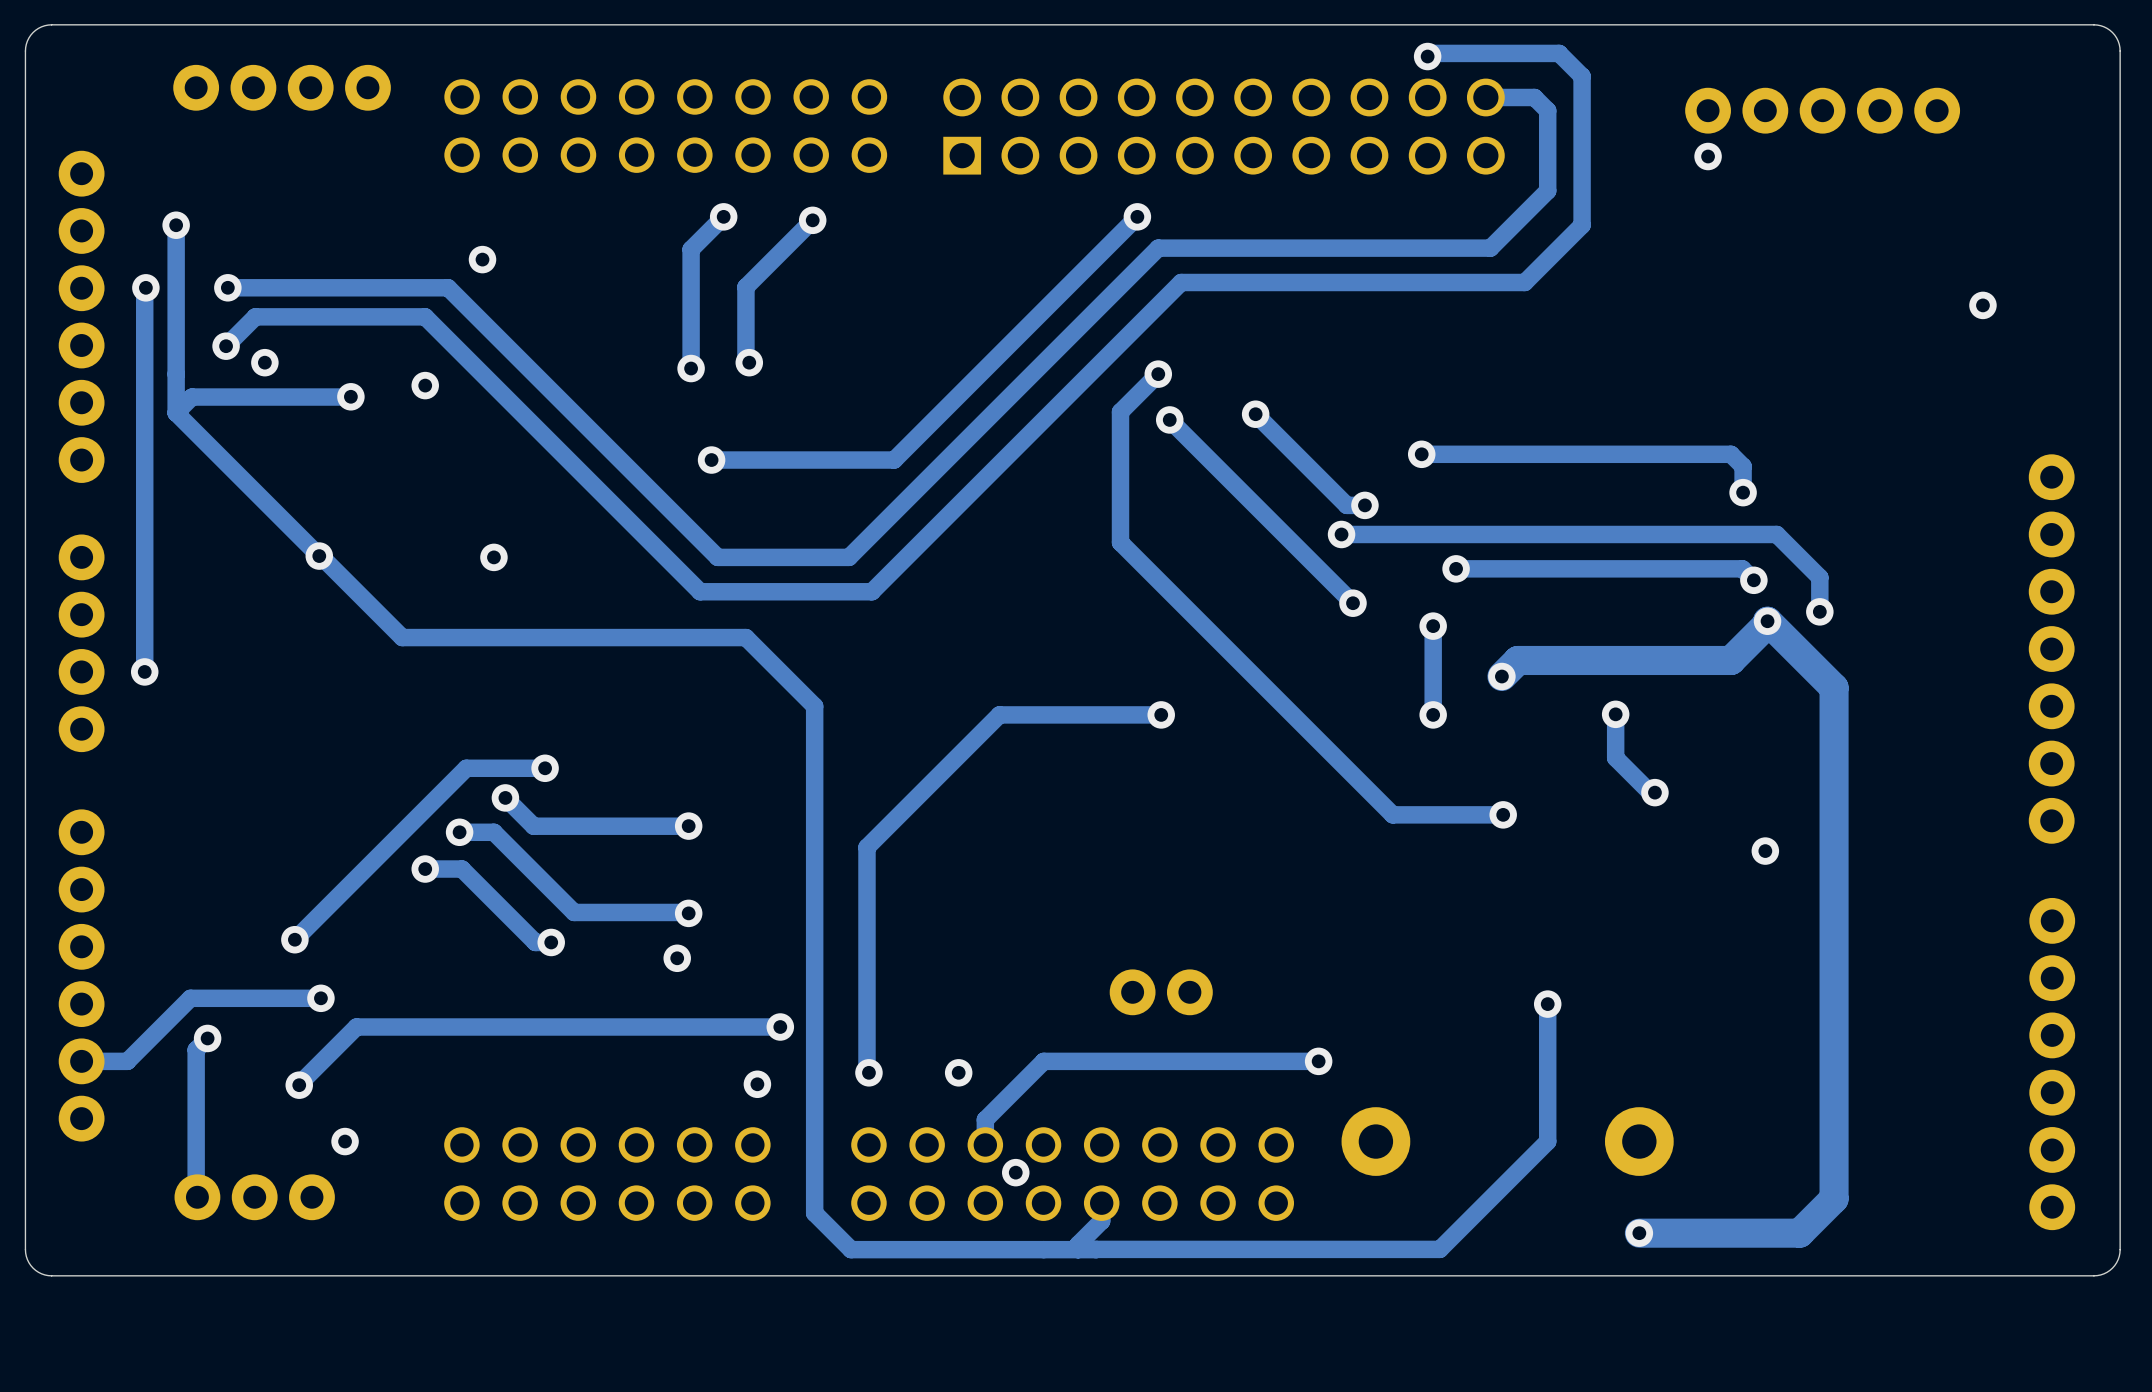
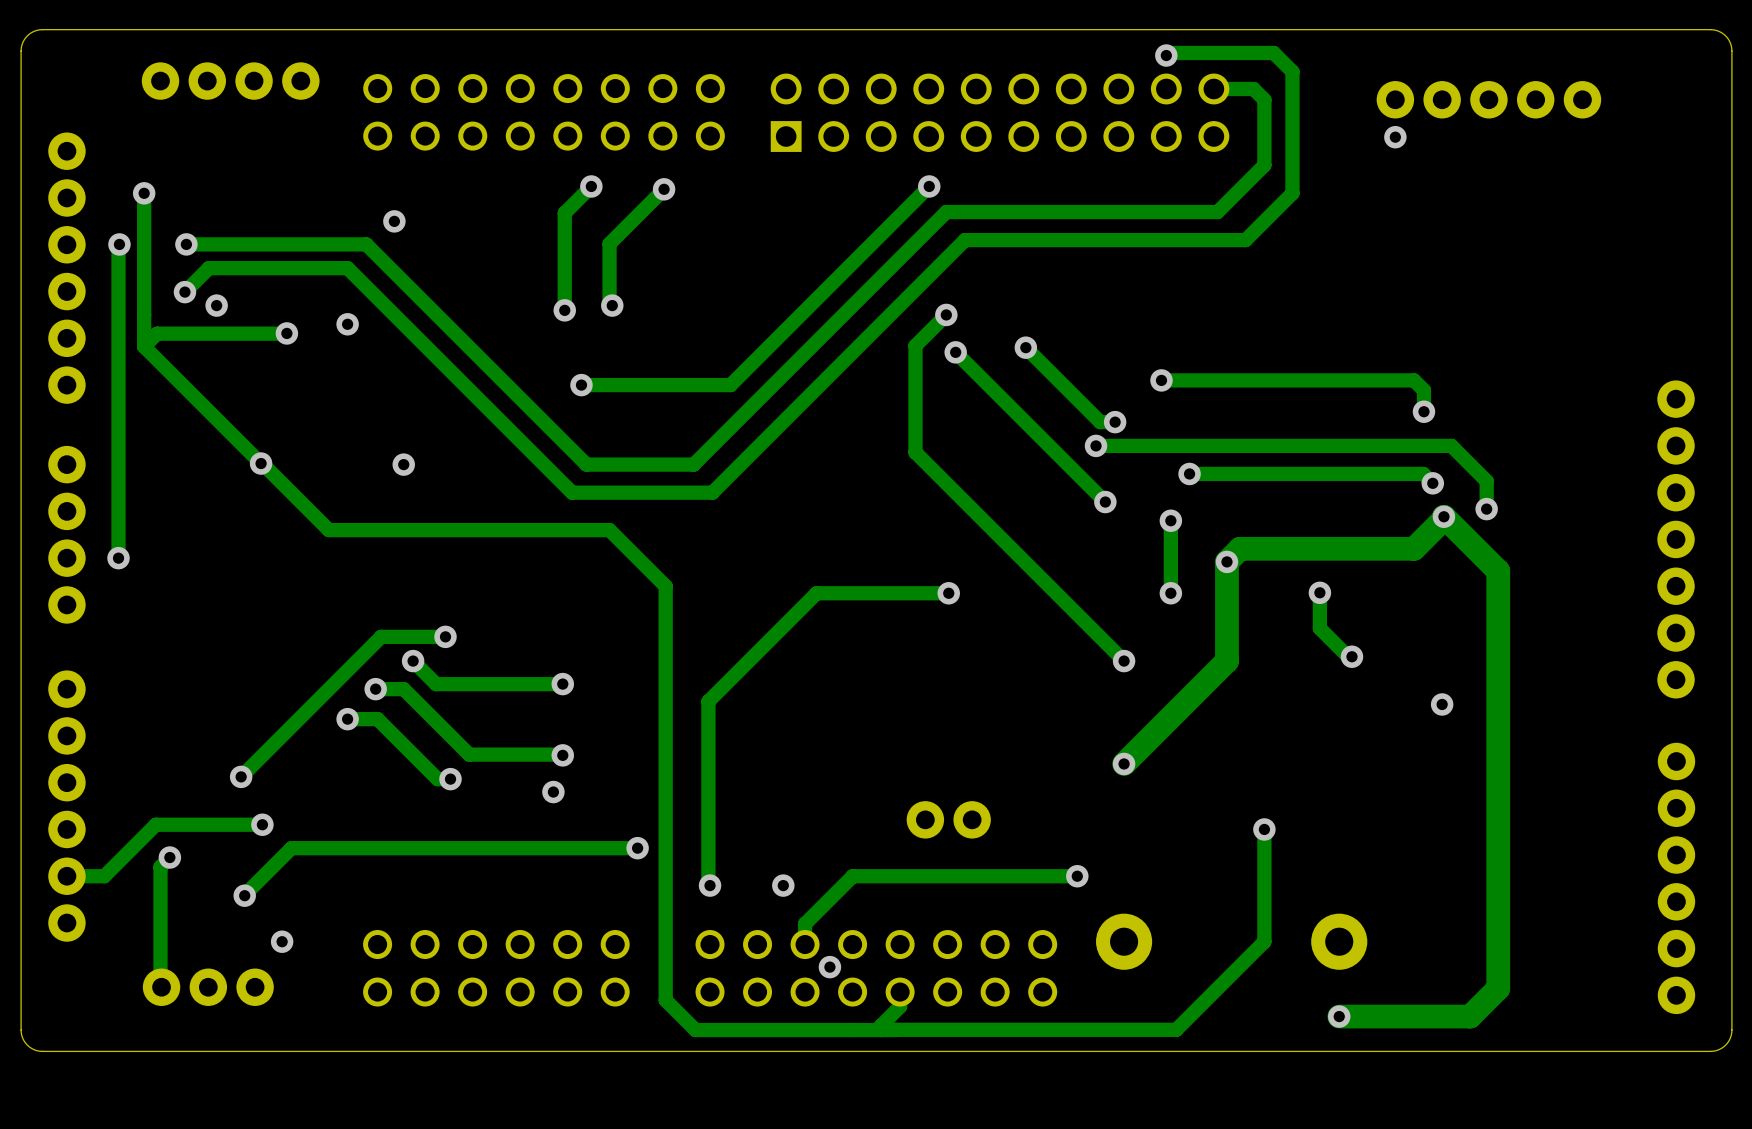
via: (1982, 305) -> none
track: none -> (1226, 561) (1226, 661) (1124, 763)
track: (1375, 797) (1392, 814) (1503, 814) -> none
via: none -> (1124, 661)
via: (1503, 814) -> none
via: none -> (1124, 763)
via: (757, 1084) -> none

